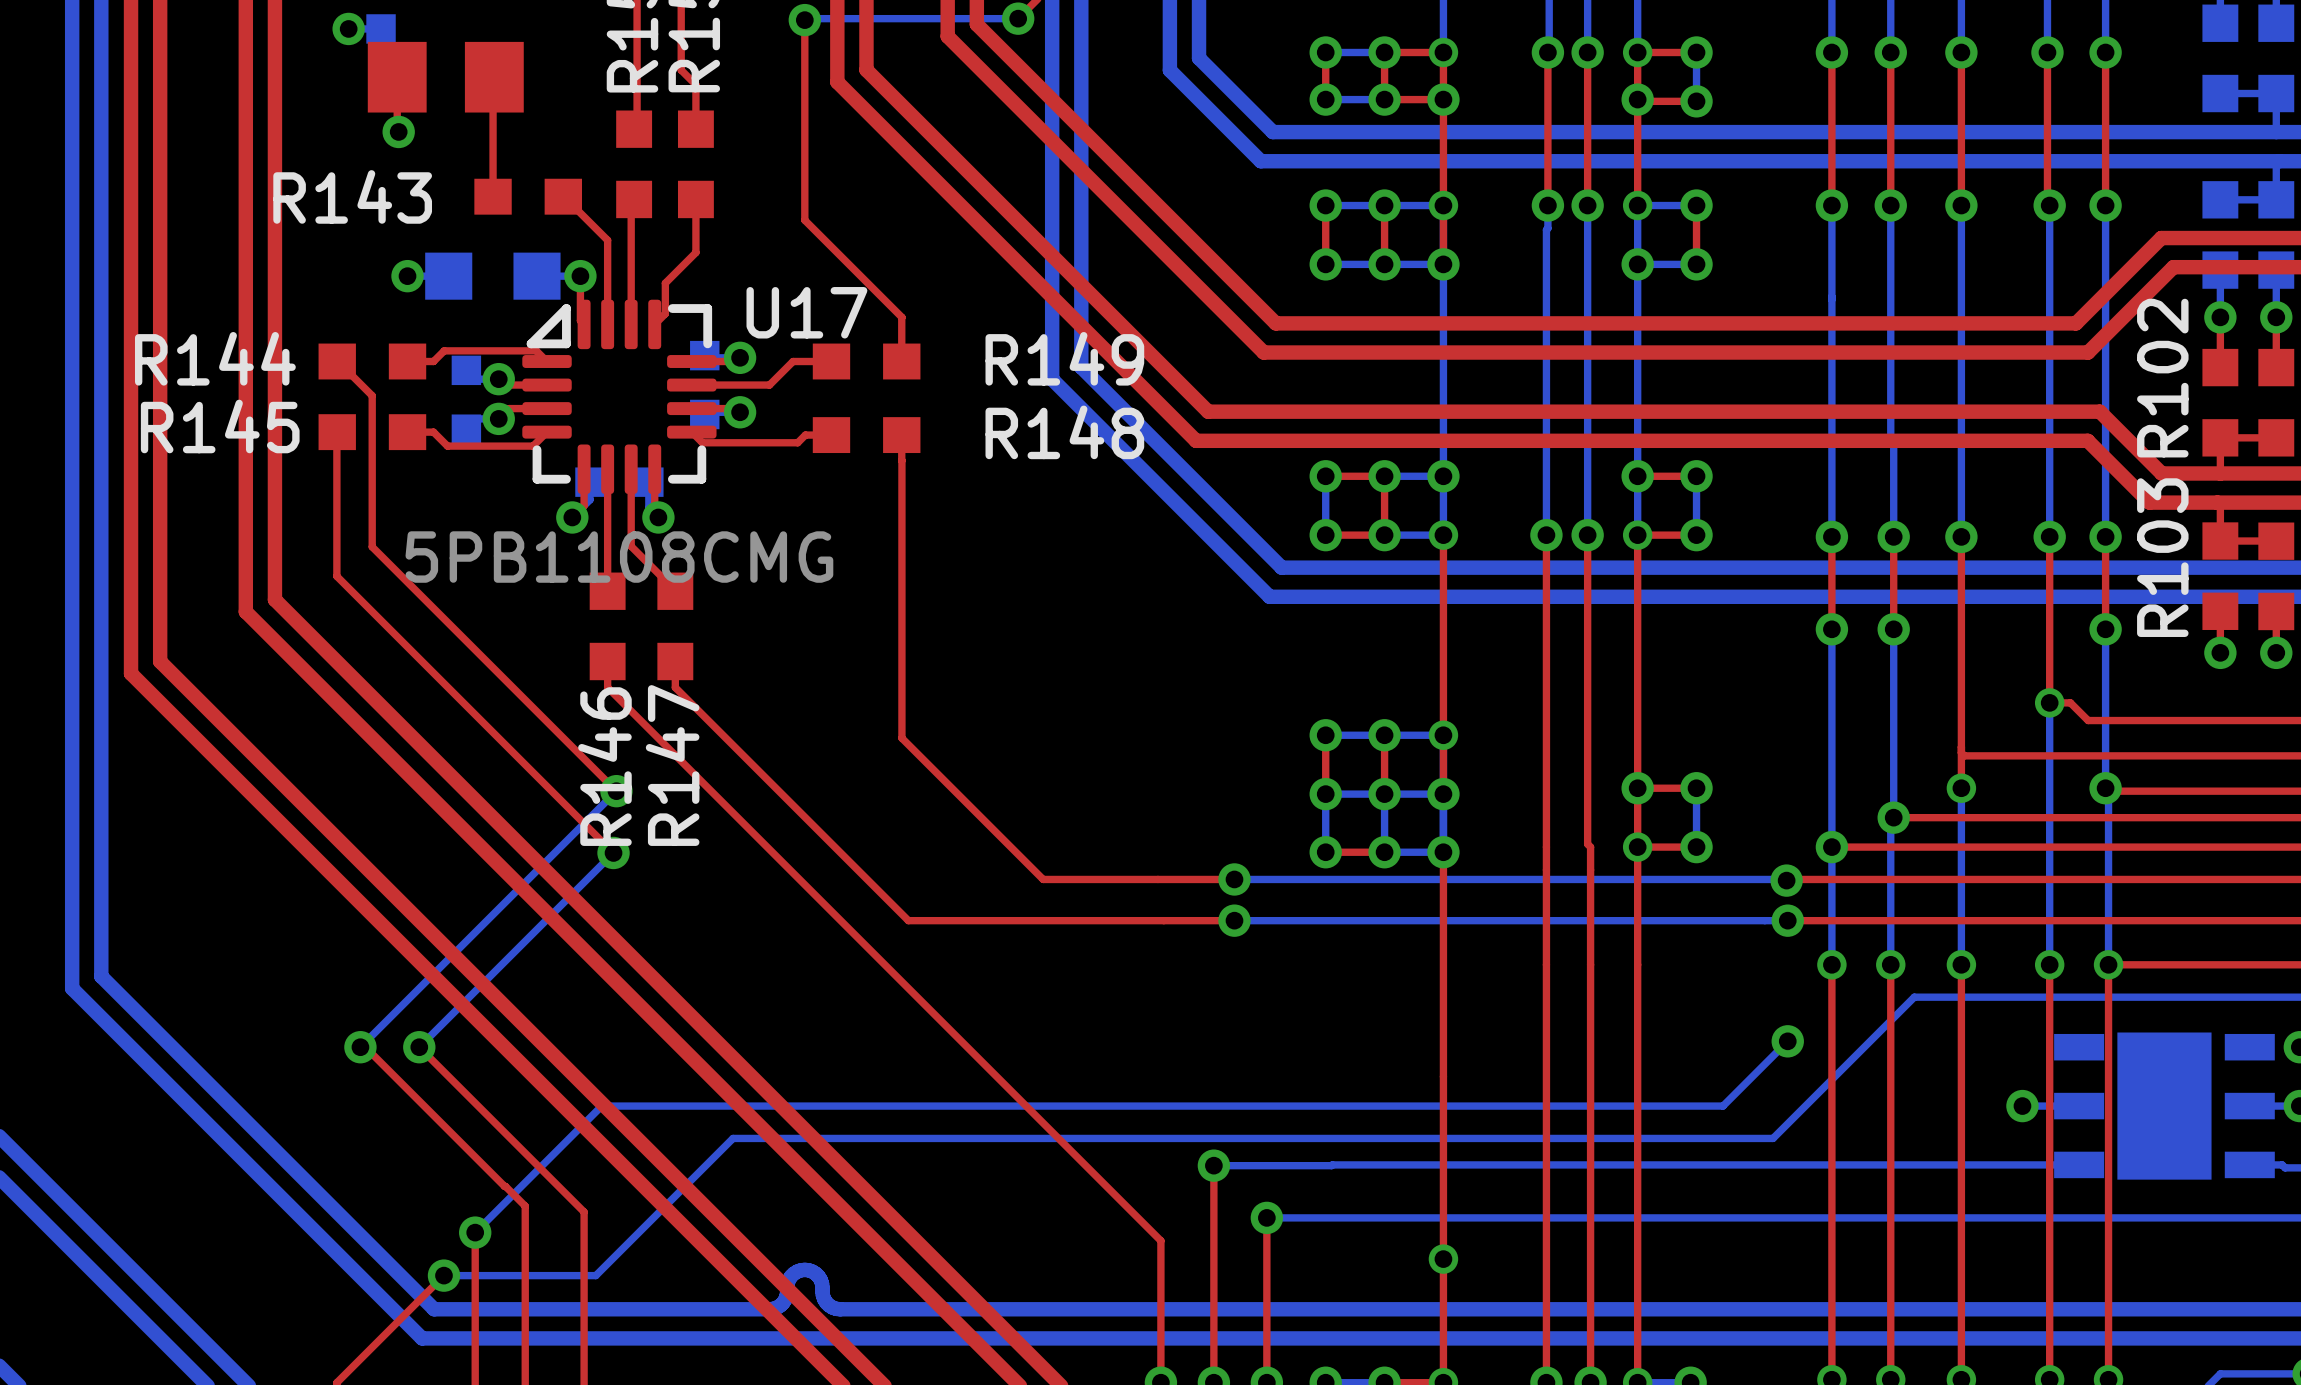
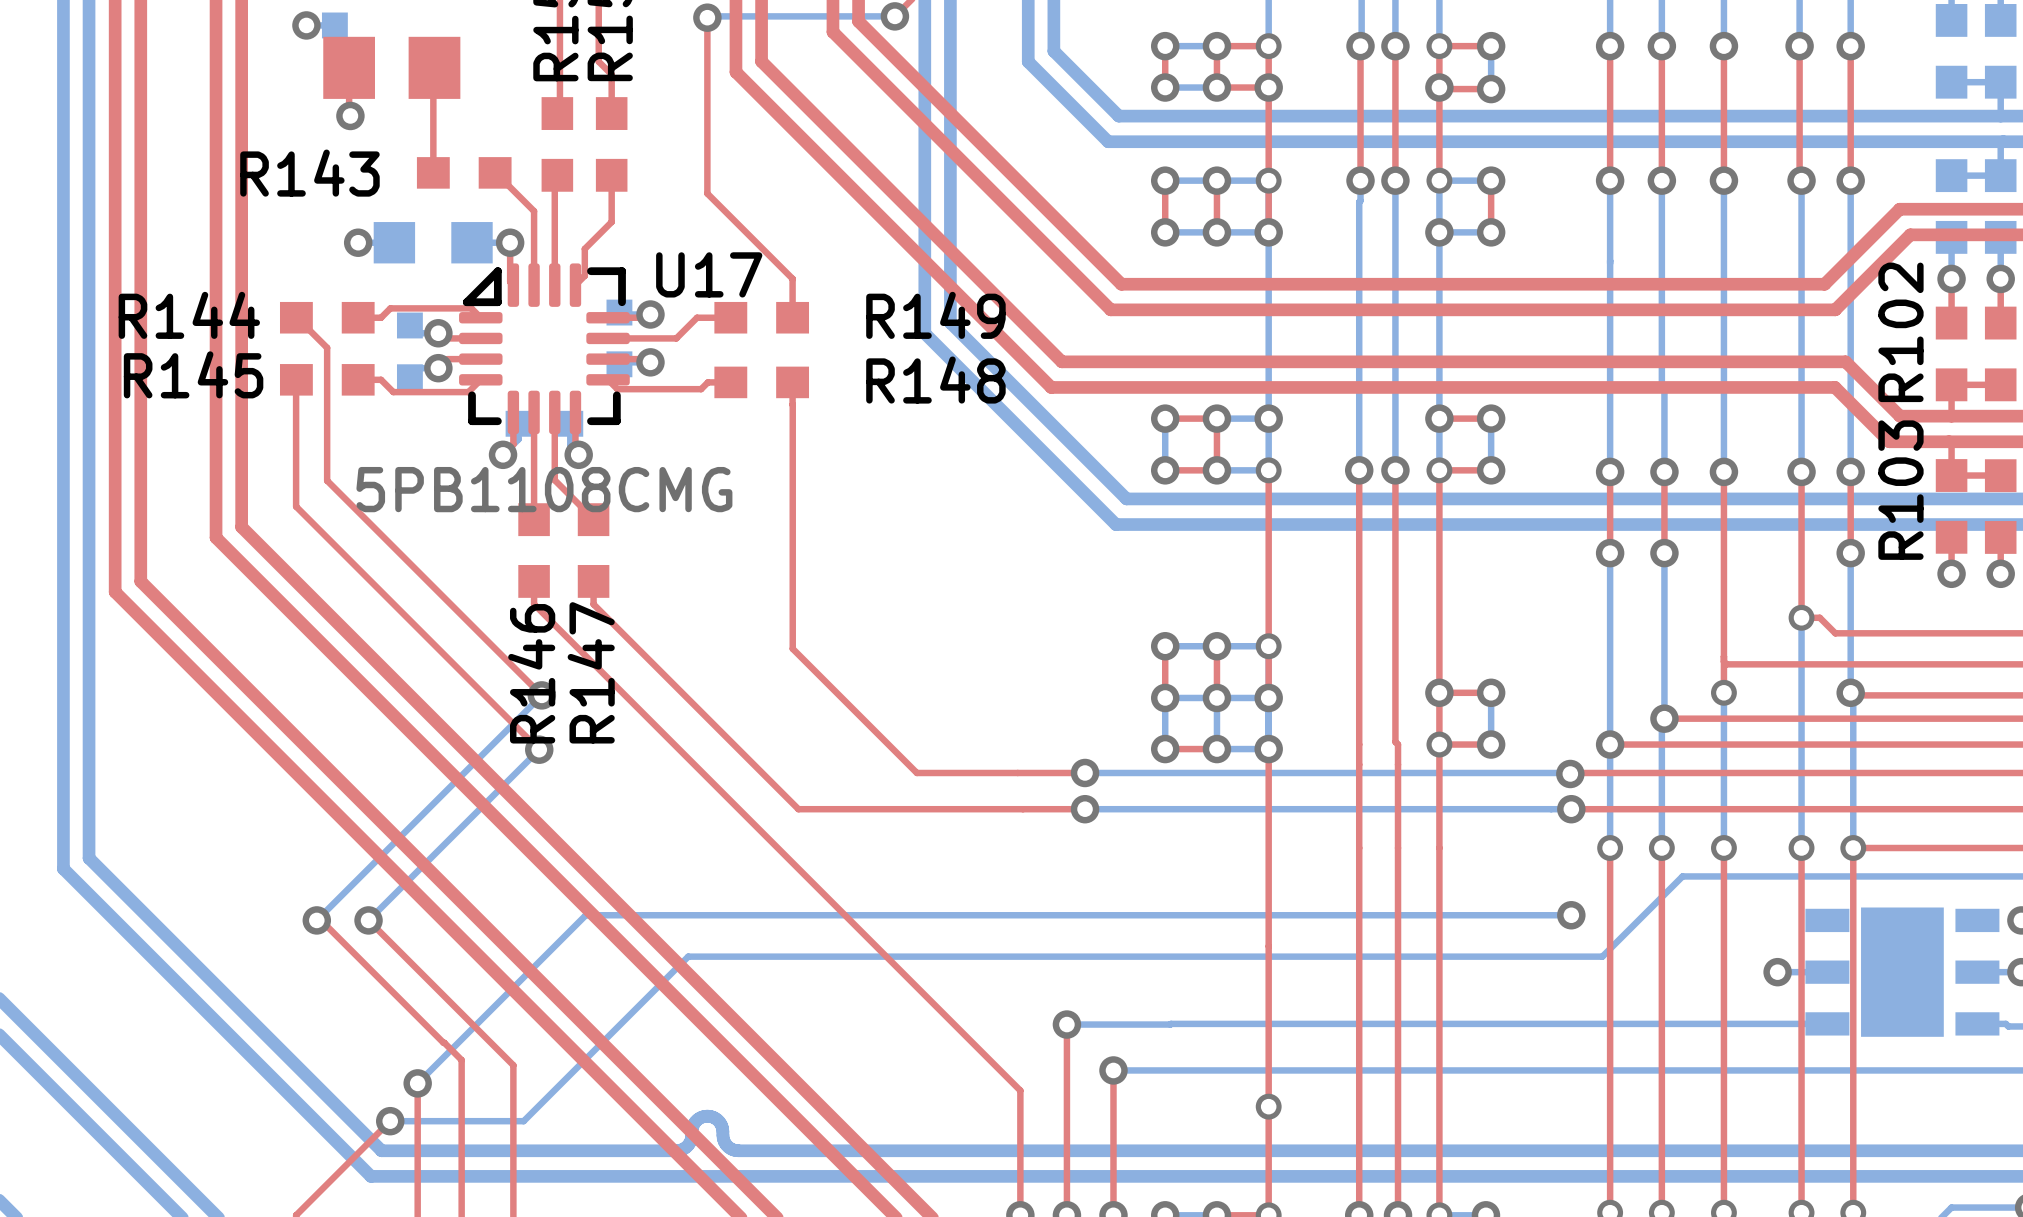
bottom track: (1787, 1041) (1723, 1106) (601, 1106) -> (1571, 915) (585, 915) (528, 972)
bottom track: (1823, 1088) (1773, 1138) (733, 1138) -> (1602, 956) (688, 956) (644, 1000)

